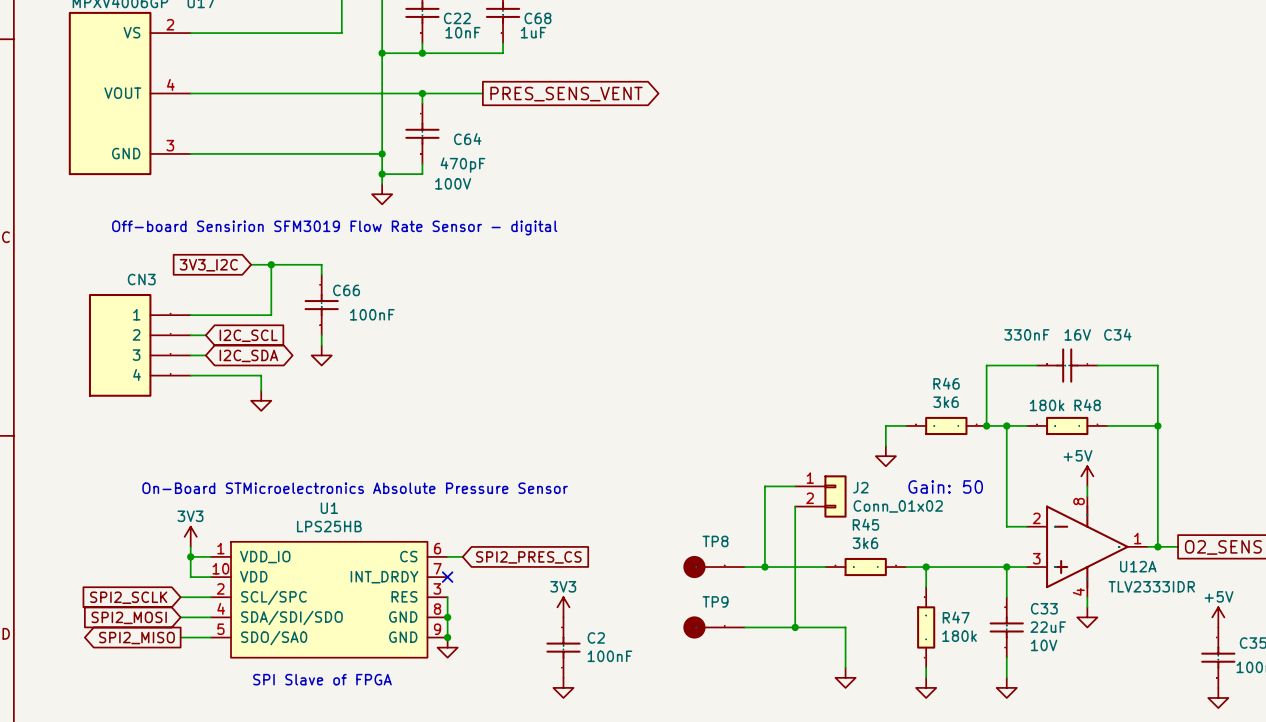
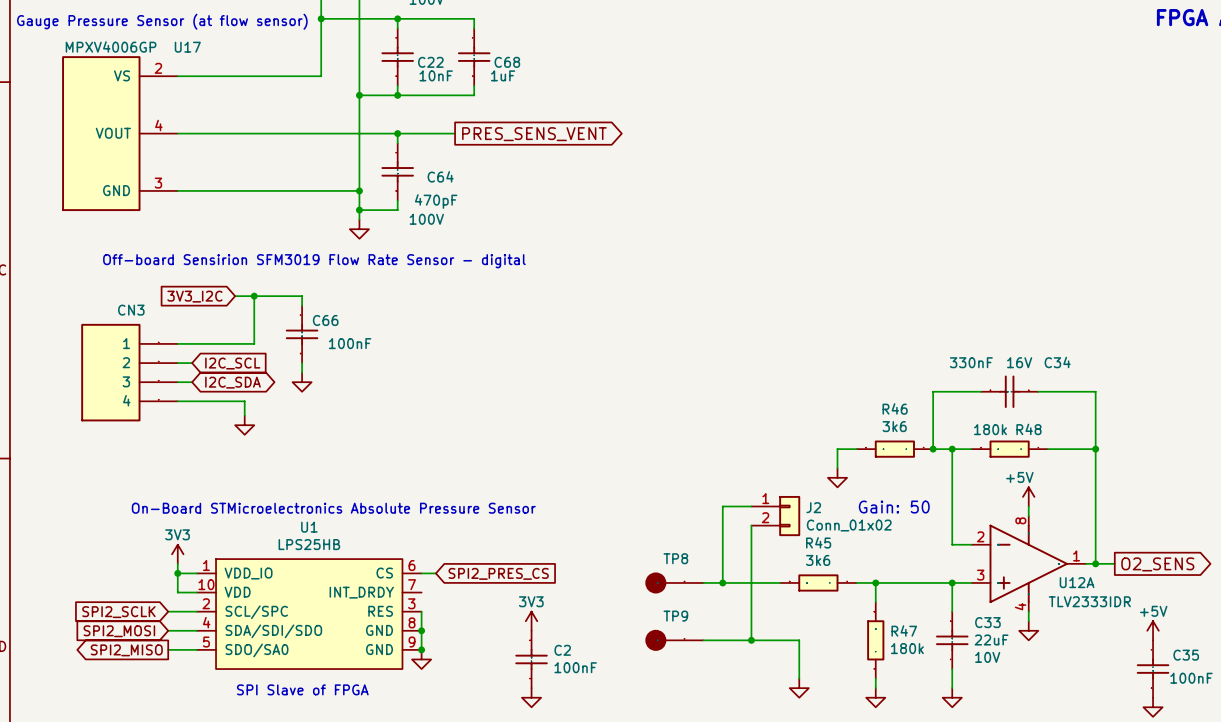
no-connect mark: (447, 577) -> none

